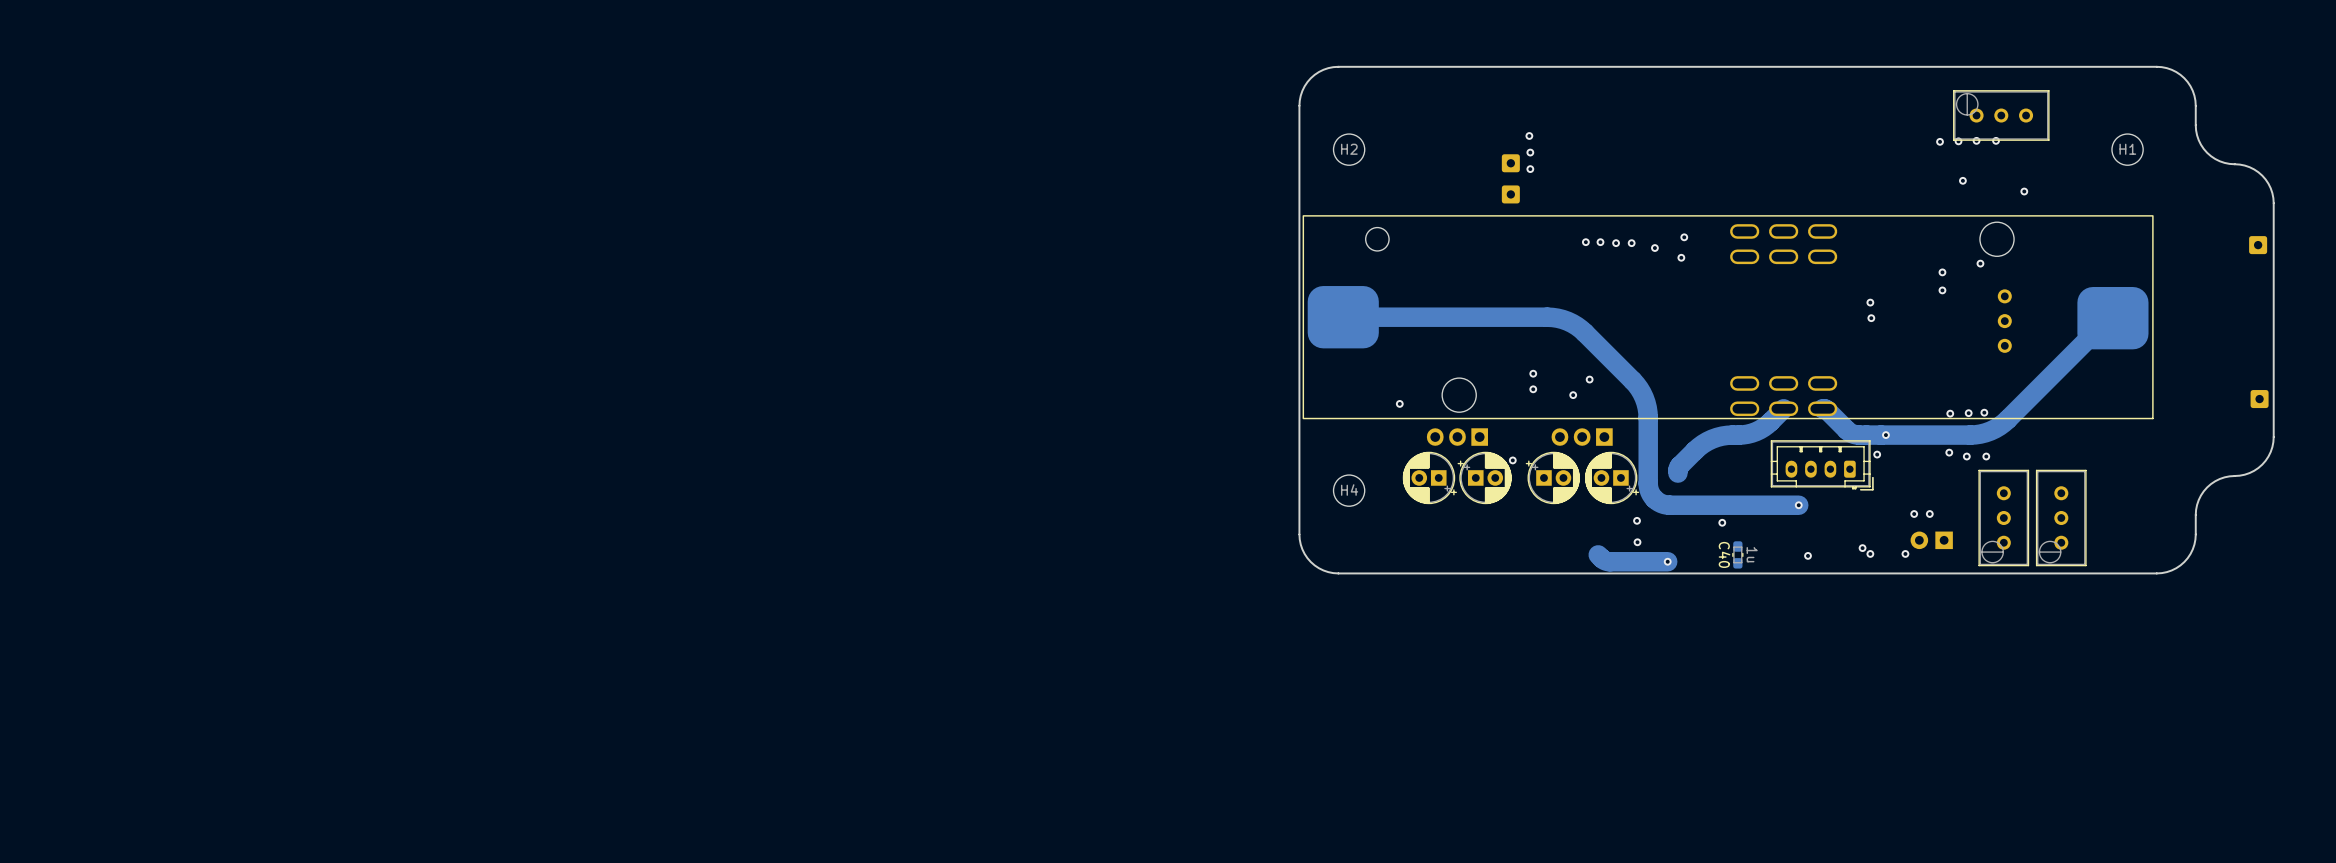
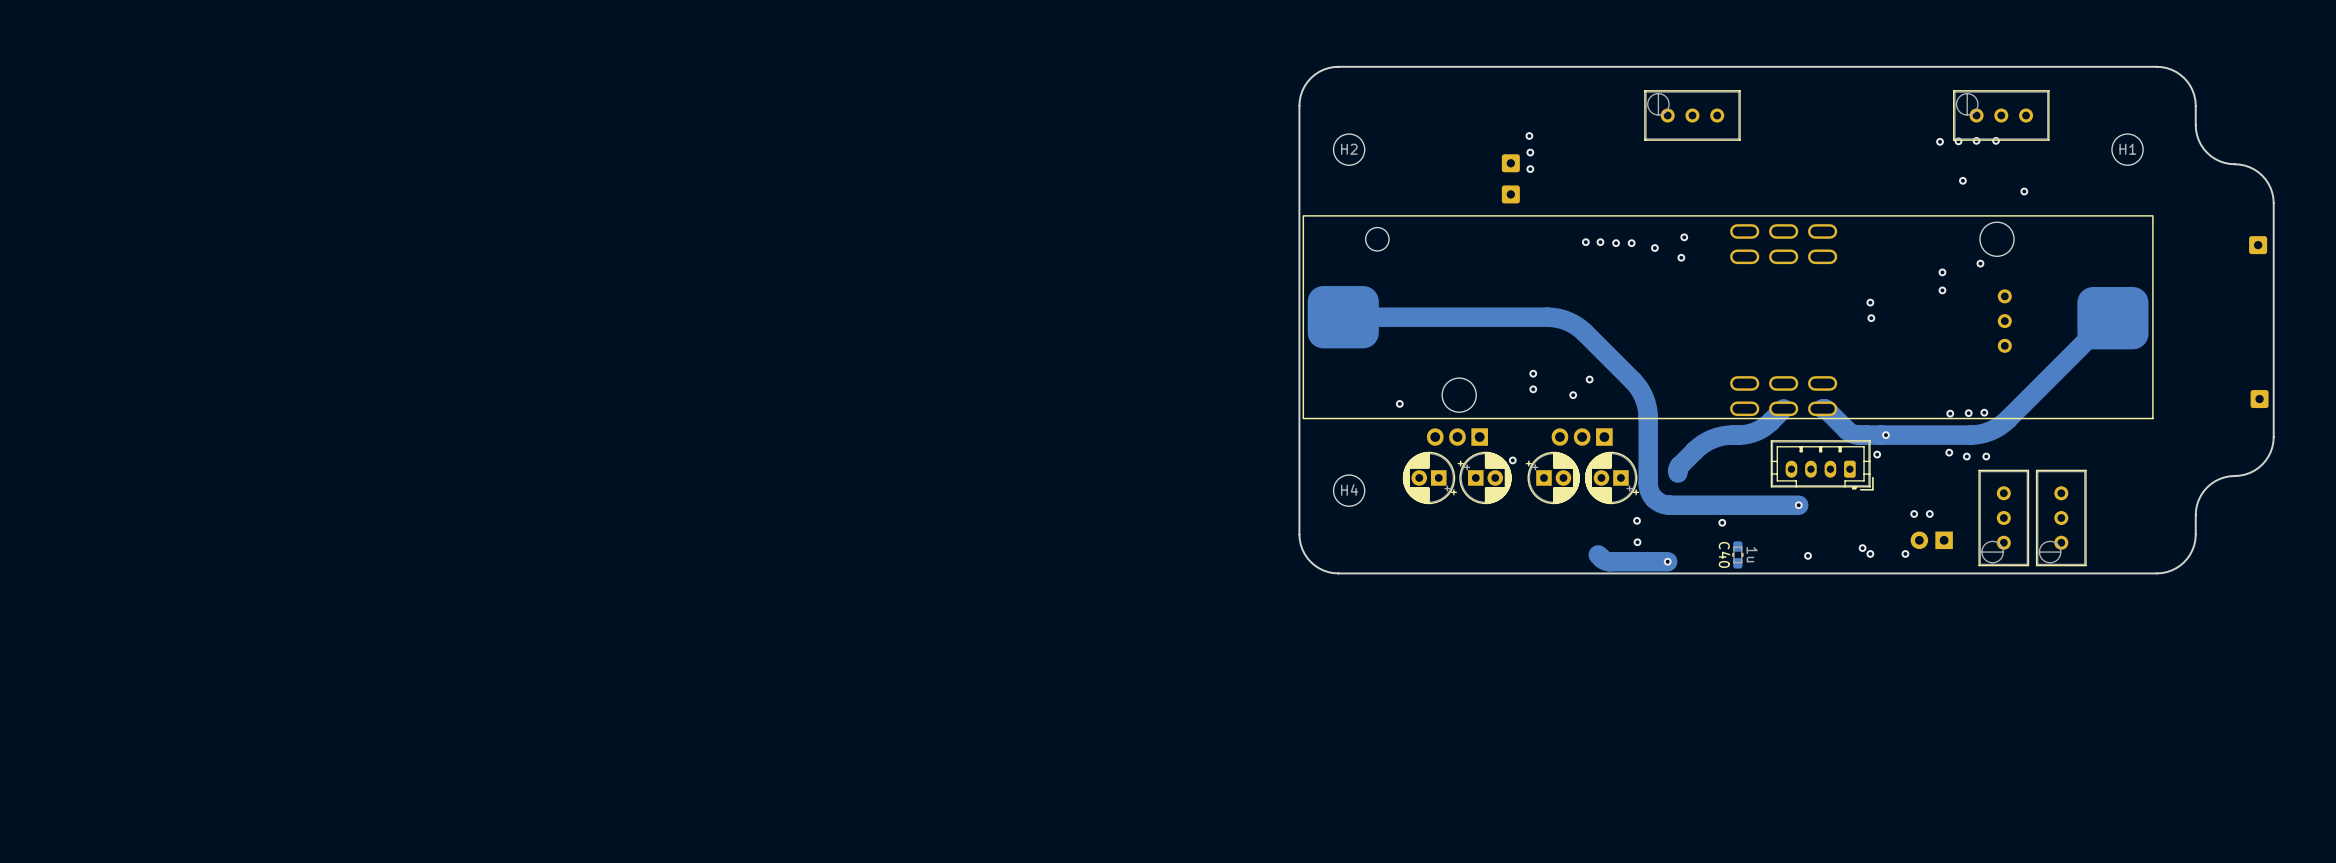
part: none -> (1692, 115)

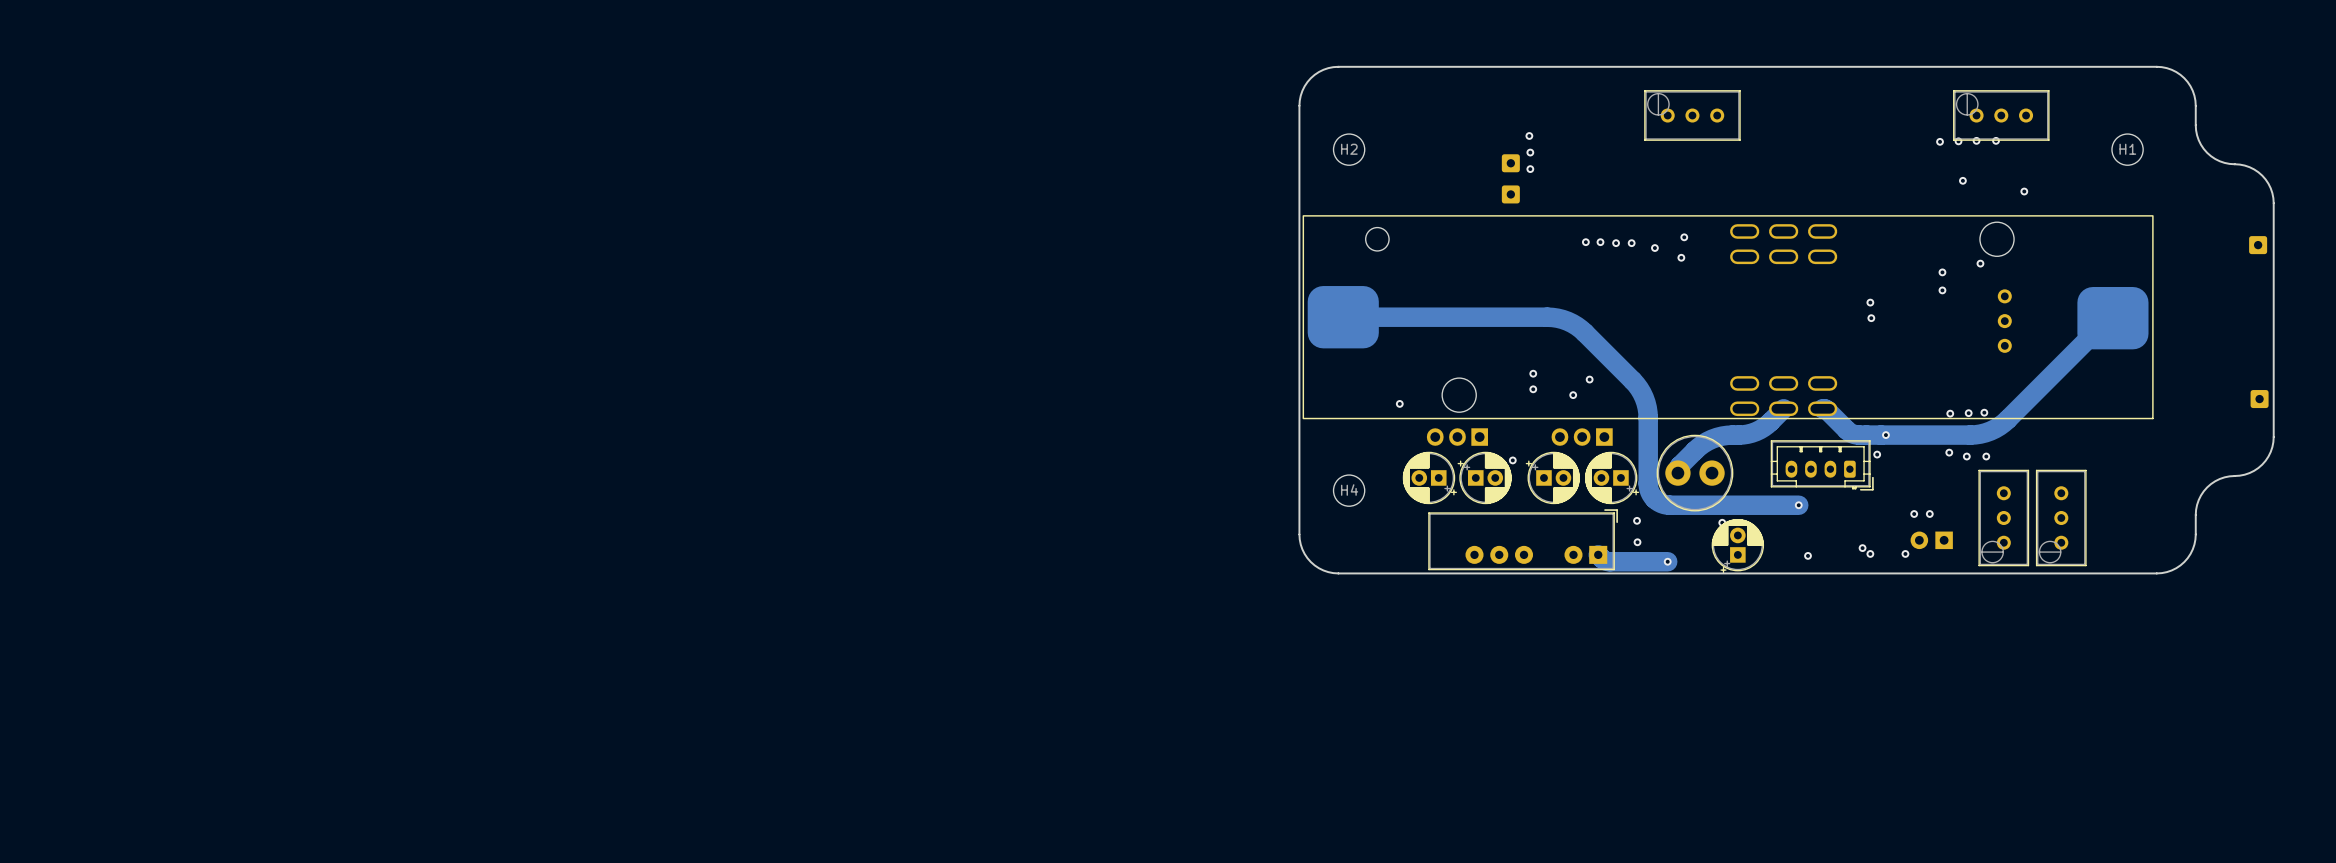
part: none -> (1694, 473)
part: none -> (1523, 539)
part: none -> (1737, 546)
C40: 1u (1737, 554) -> none

